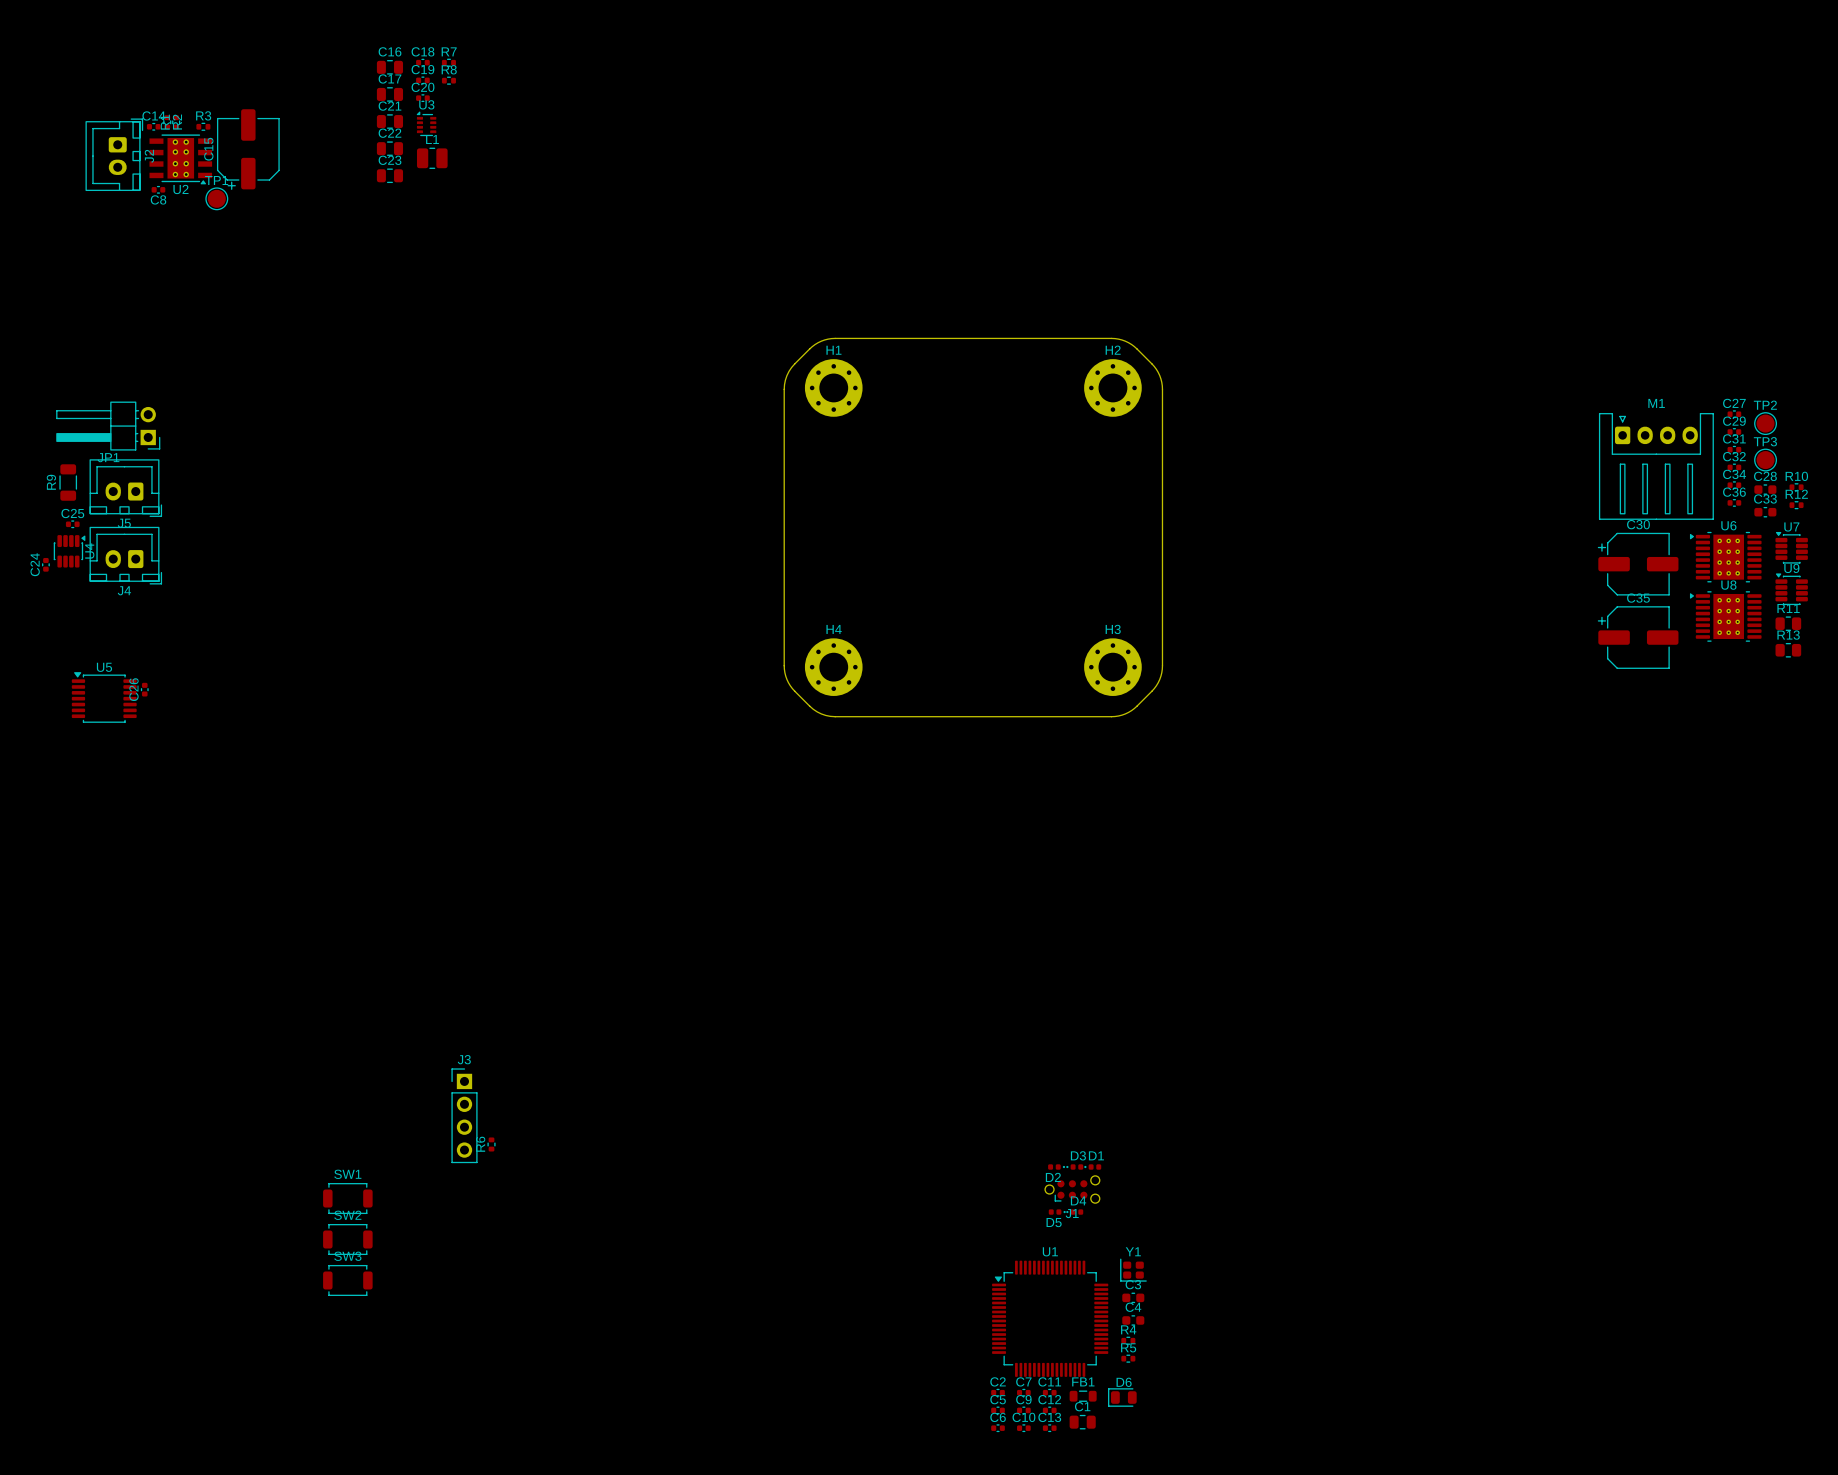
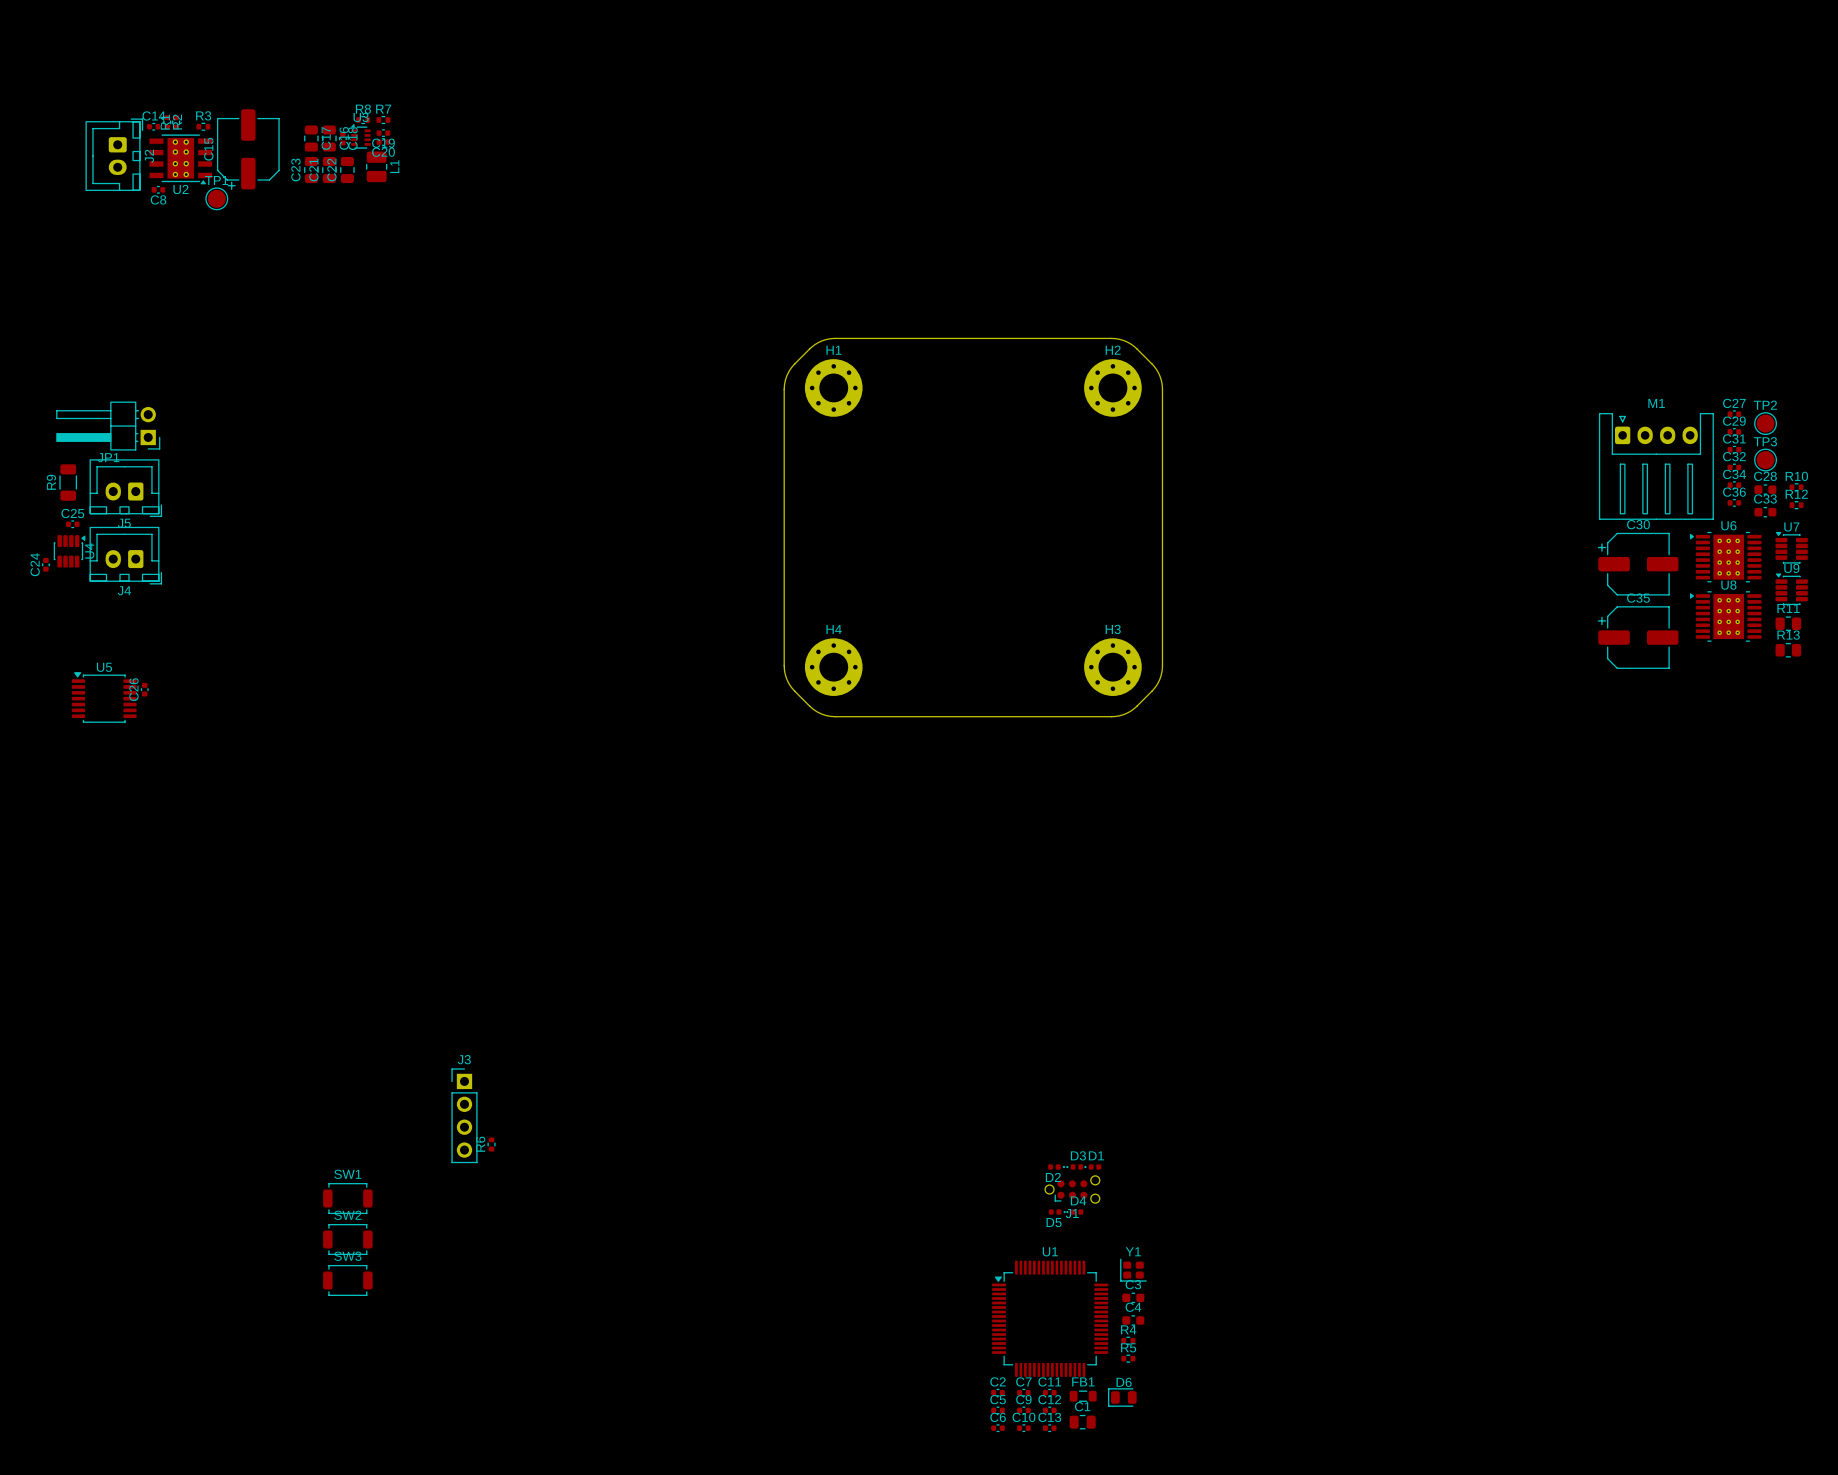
C18 rotation: 0° (422, 62) -> 90° clockwise (342, 138)
C18 position: (422, 62) -> (342, 138)
R7 position: (448, 62) -> (383, 120)
C16 rotation: 0° (389, 67) -> 90° clockwise (329, 138)
C16 position: (389, 67) -> (329, 138)
C19 name position: C19 (422, 69) -> C19 (383, 143)
C19 position: (422, 80) -> (383, 133)
R8 position: (448, 80) -> (363, 120)
C20 name position: C20 (423, 87) -> C20 (383, 152)
C17 rotation: 0° (389, 94) -> 90° clockwise (311, 138)
C17 position: (389, 94) -> (311, 138)
C20 position: (422, 98) -> (383, 142)
C21 name position: C21 (389, 106) -> C21 (313, 169)
C21 rotation: 0° (389, 121) -> 90° clockwise (329, 170)
C21 position: (389, 121) -> (329, 170)
U3 position: (426, 123) -> (360, 136)
C22 name position: C22 (389, 133) -> C22 (331, 170)
C22 rotation: 0° (389, 148) -> 90° clockwise (347, 170)
C22 position: (389, 148) -> (347, 170)
L1 rotation: 0° (432, 158) -> 90° clockwise (376, 166)
L1 position: (432, 158) -> (376, 166)
C23 name position: C23 (390, 160) -> C23 (295, 169)
C23 rotation: 0° (389, 175) -> 90° clockwise (311, 170)
C23 position: (389, 175) -> (311, 170)

